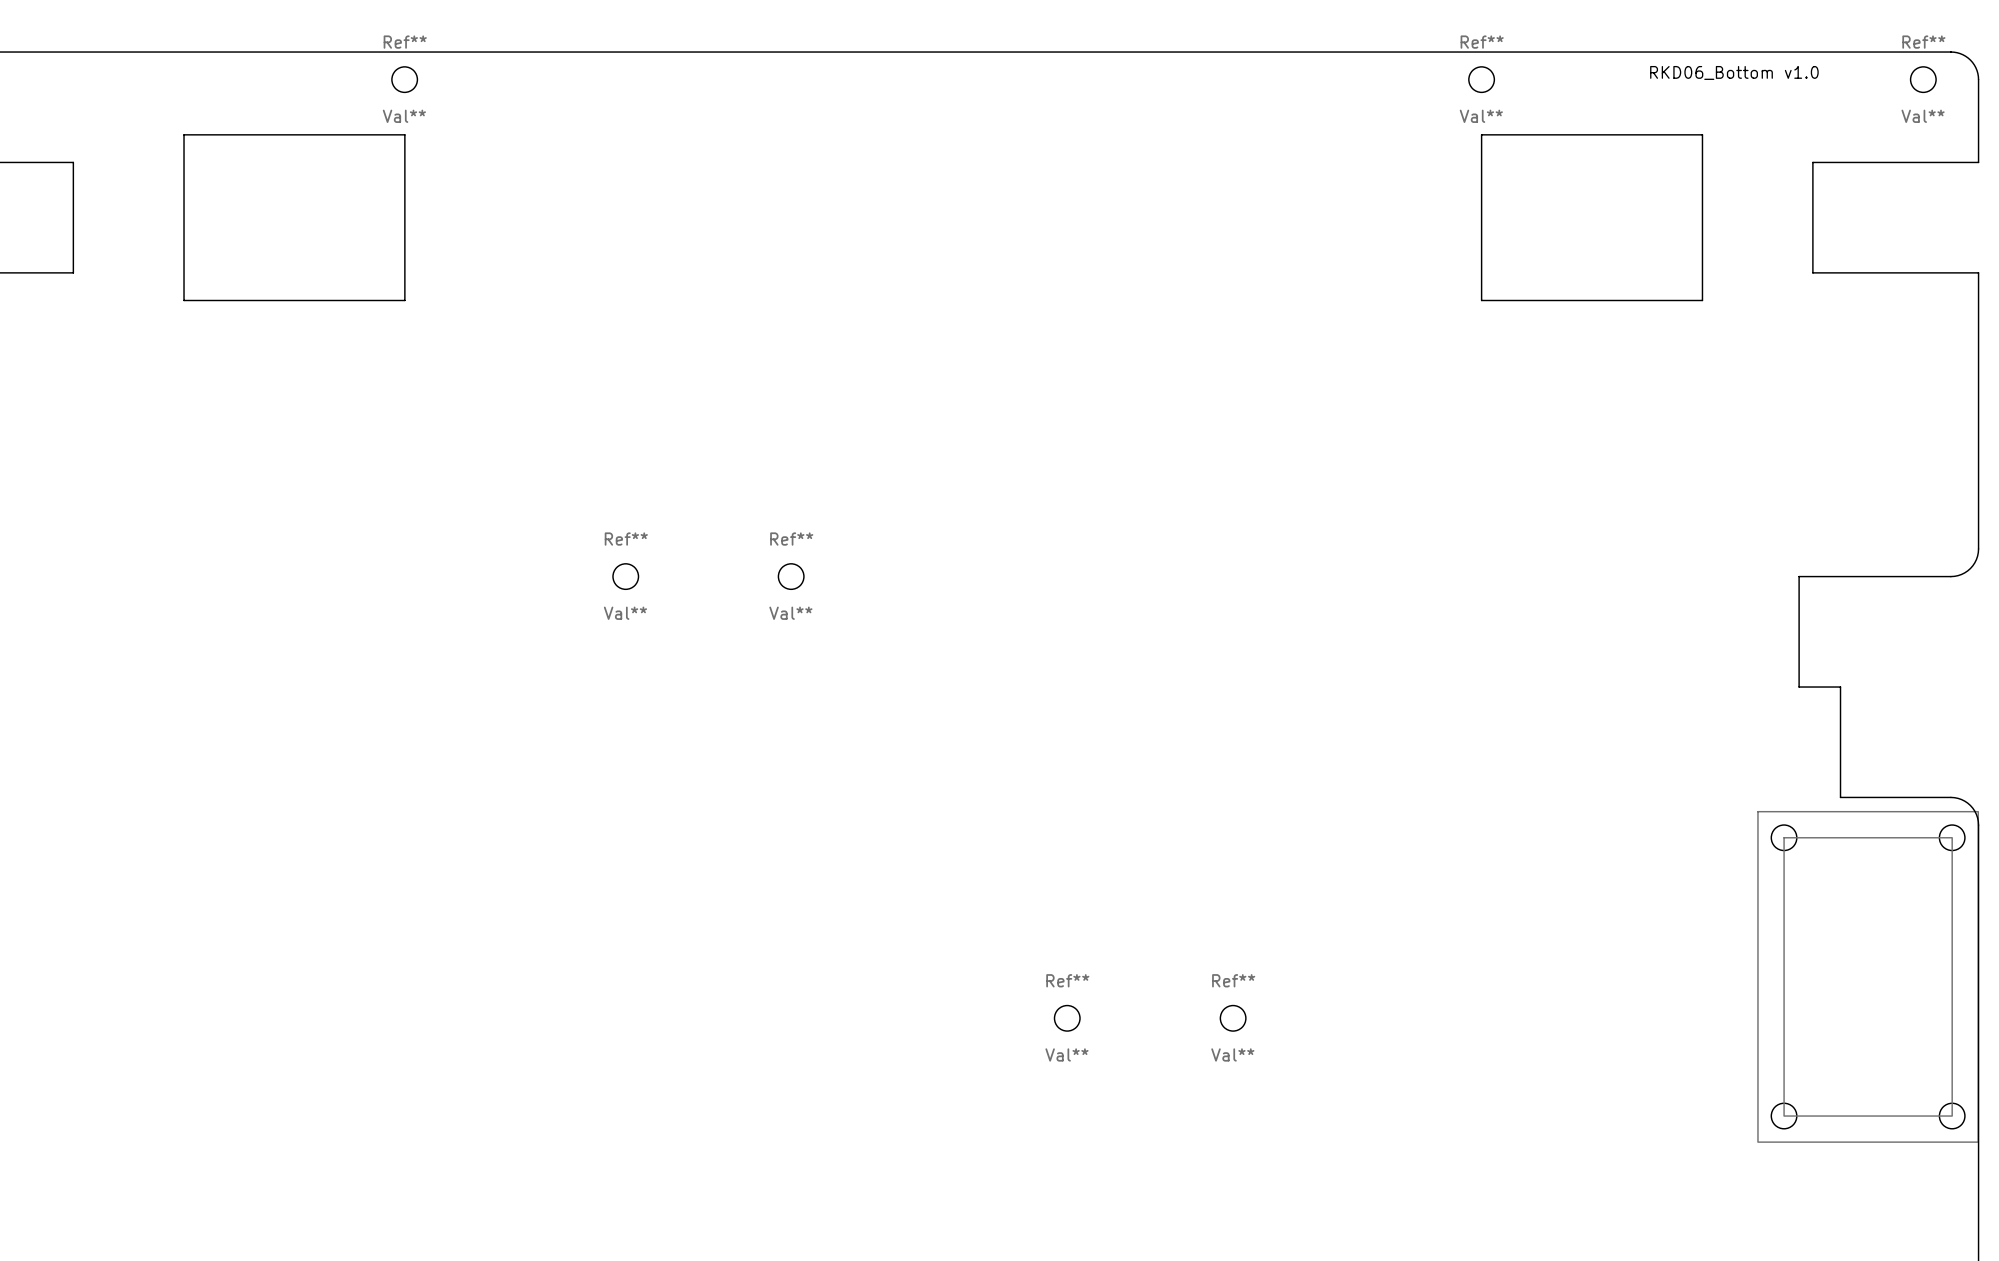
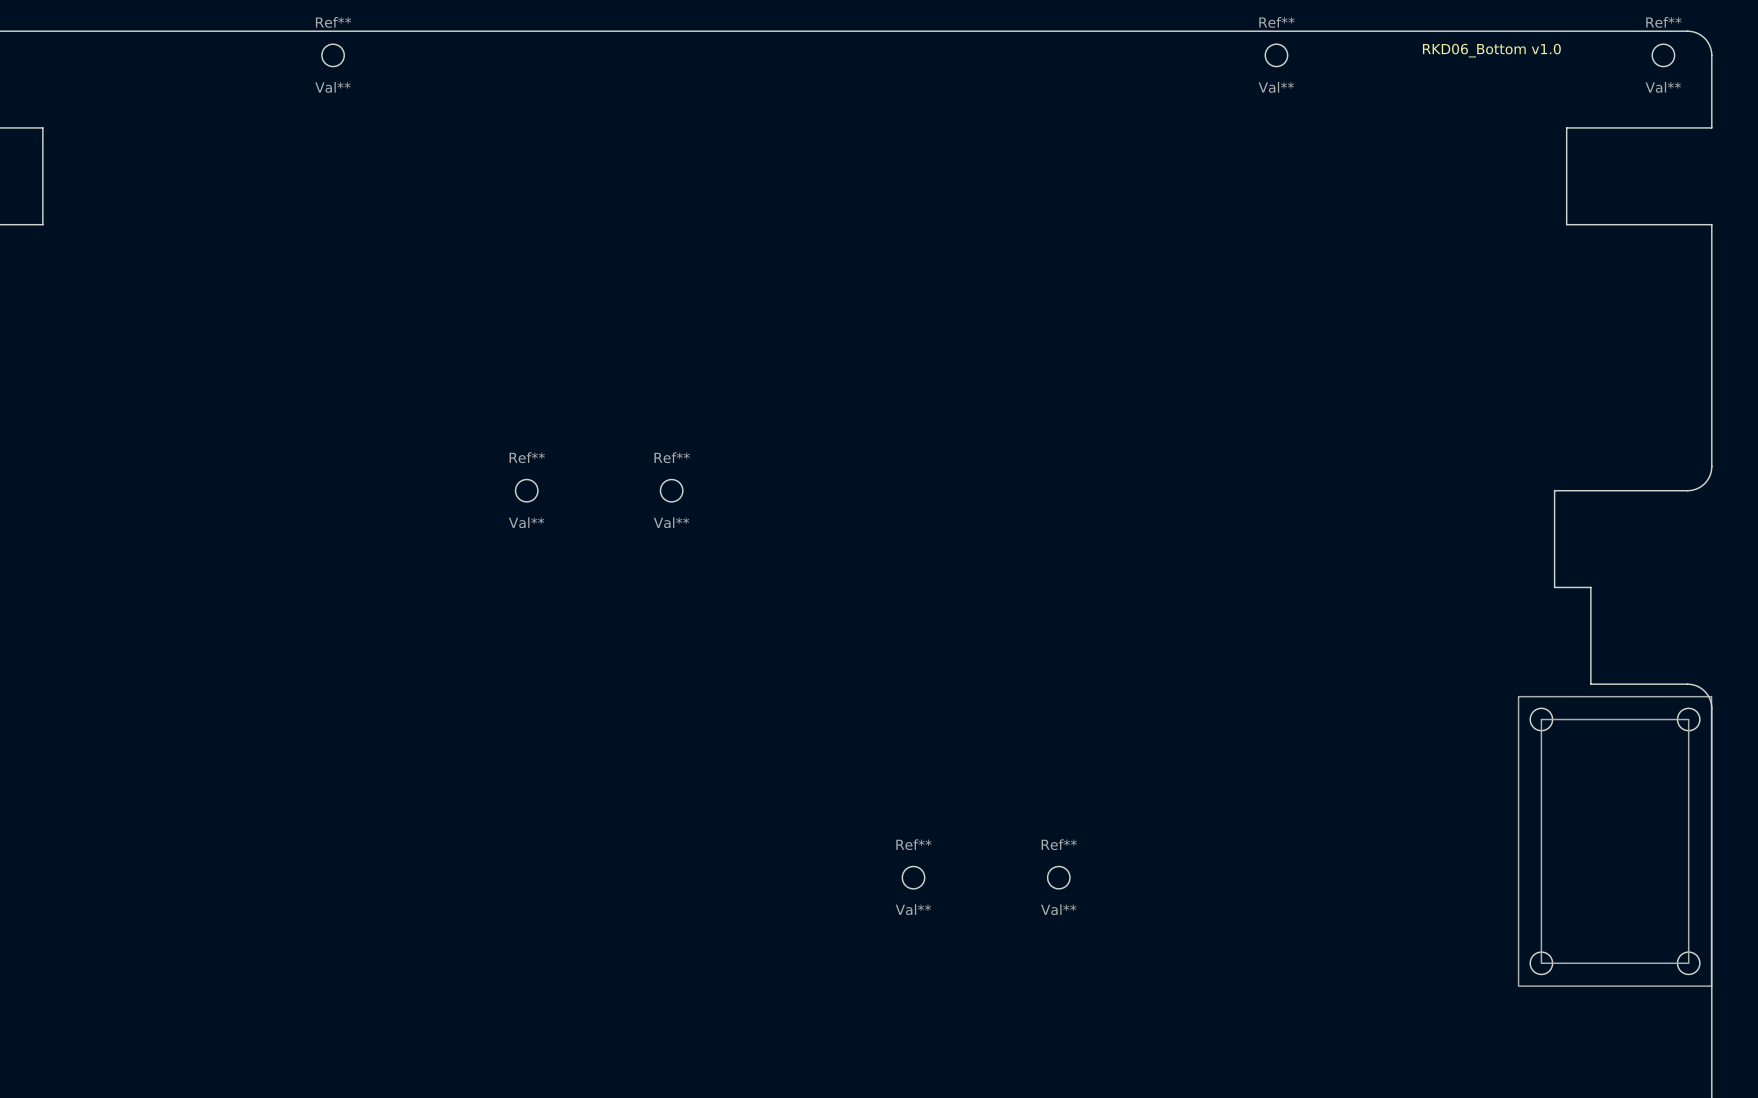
board edge: (184, 134) (184, 300) (404, 300) (404, 134) (184, 134) -> none
board edge: (1481, 134) (1702, 134) (1702, 300) (1481, 300) (1481, 134) -> none

